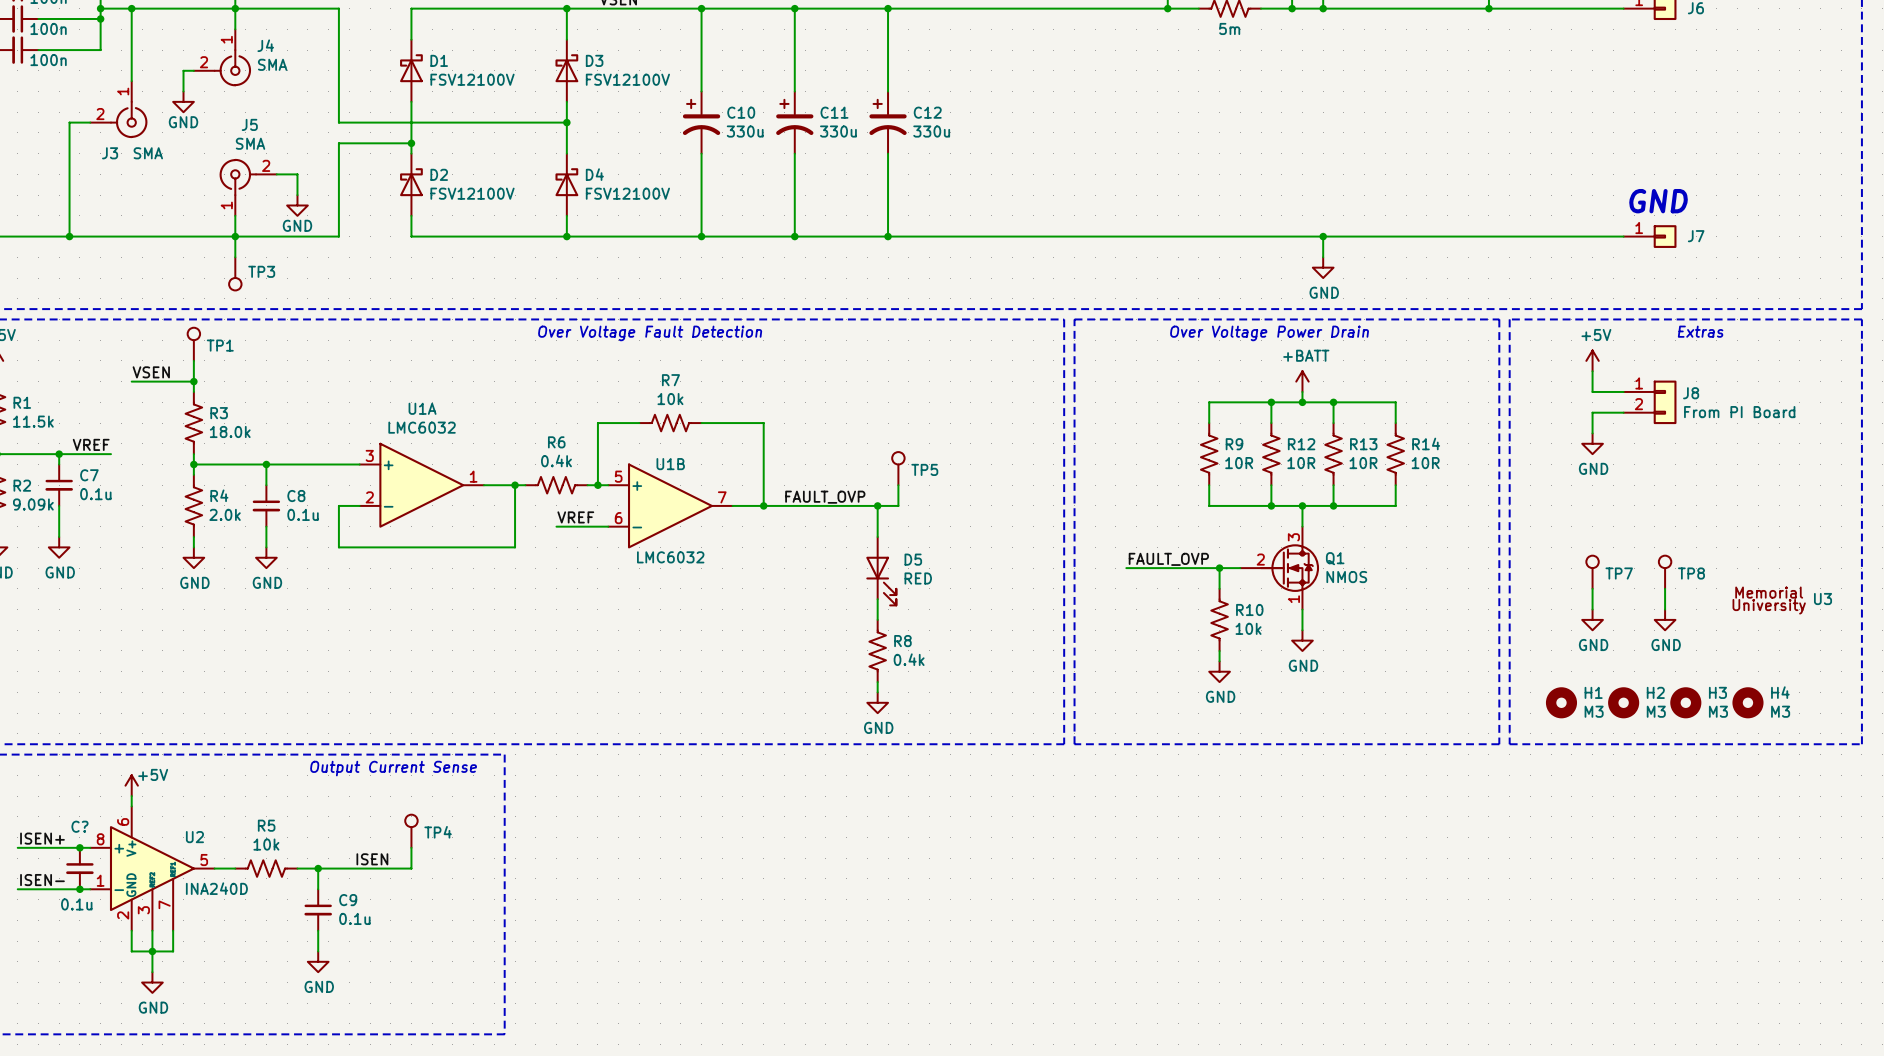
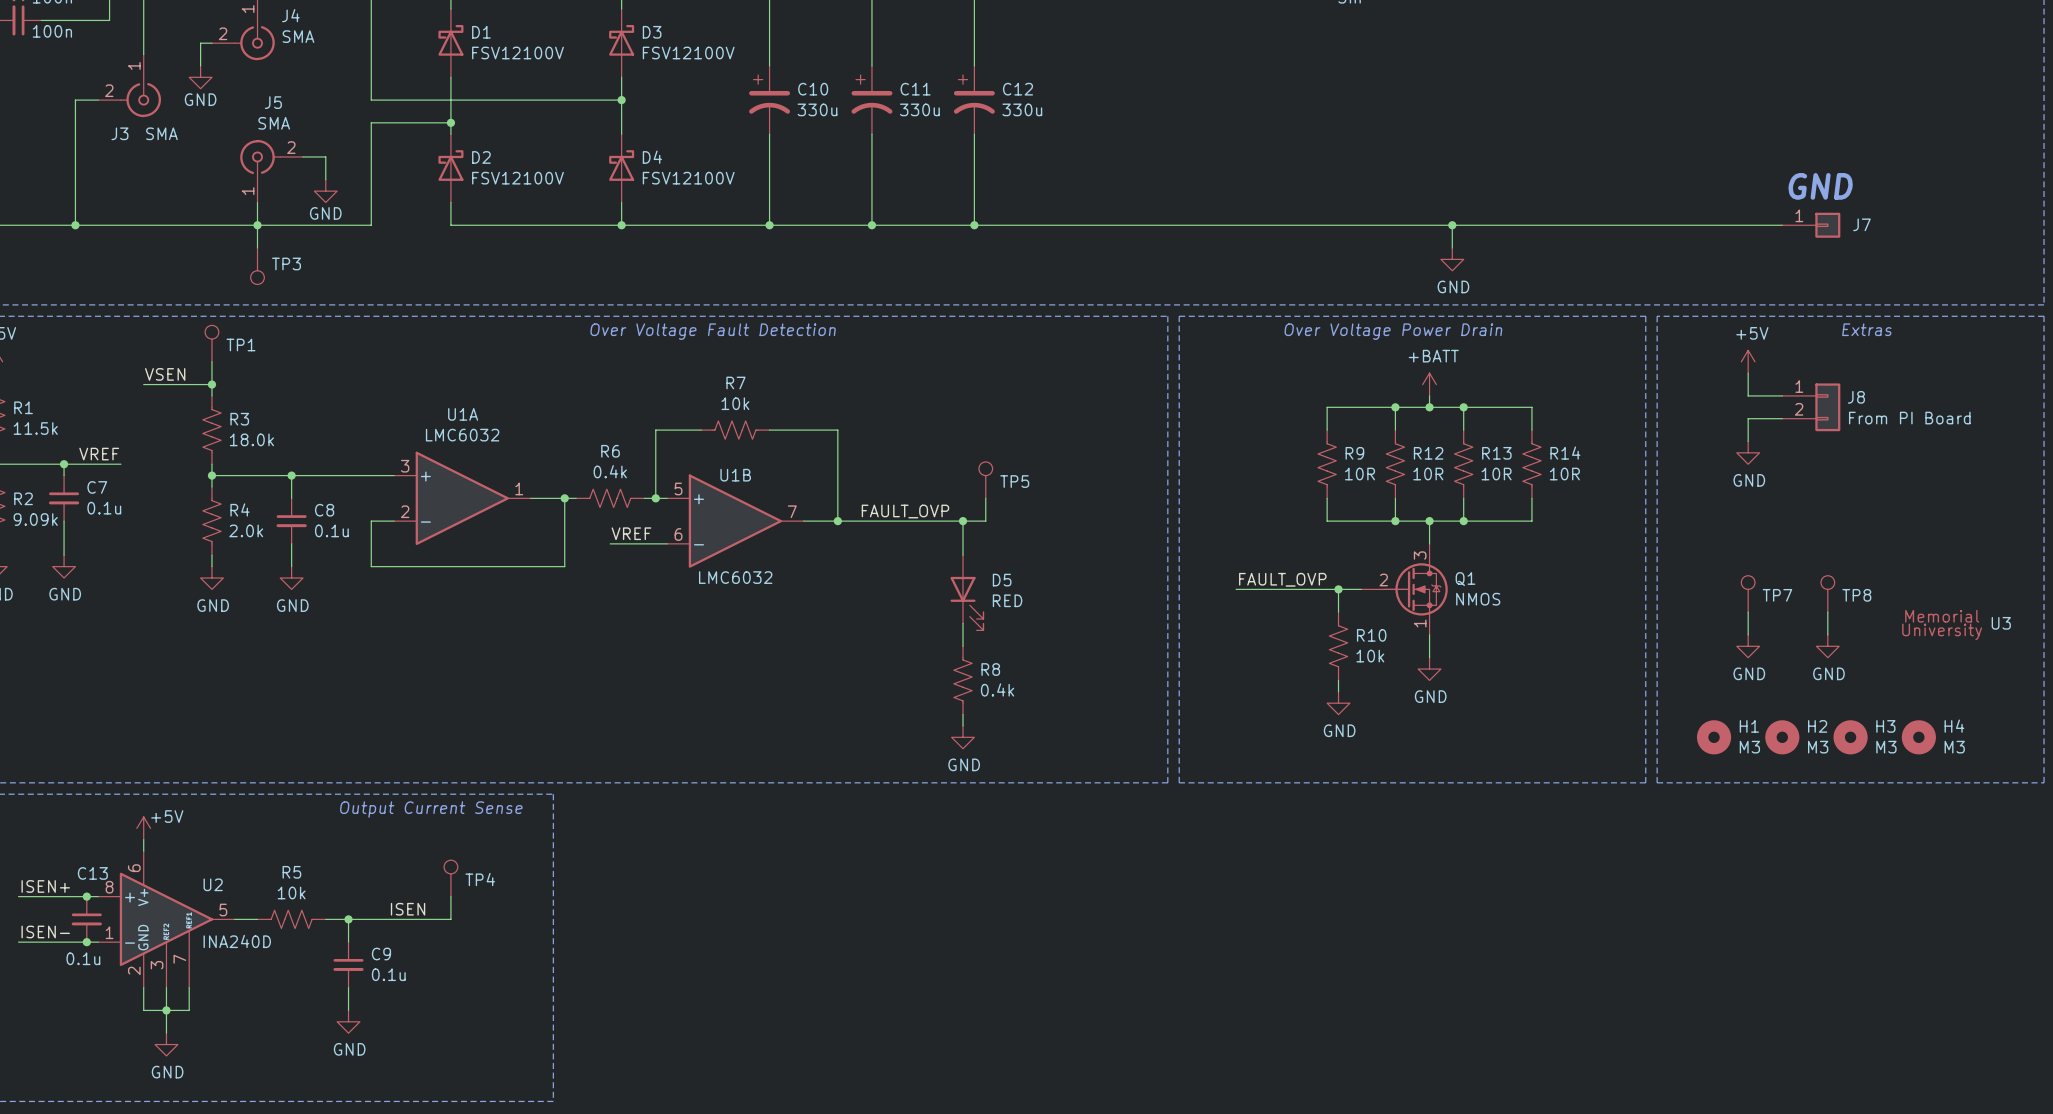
C? name: C? (79, 826) -> C13 (92, 873)

